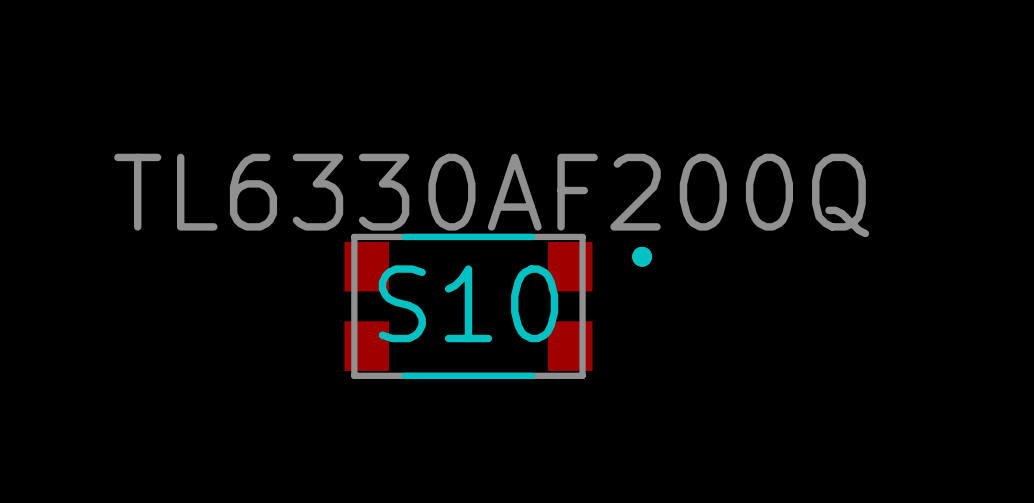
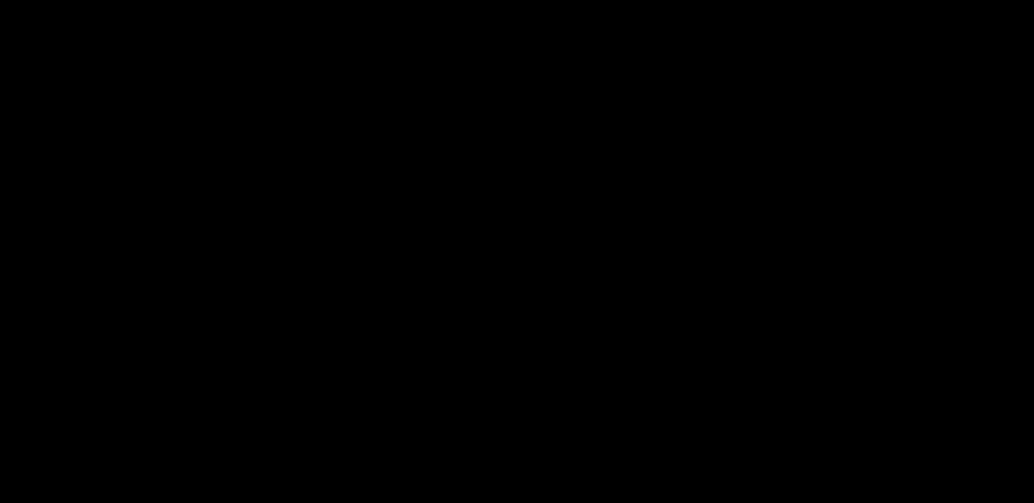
S10: TL6330AF200Q (498, 306) -> none

